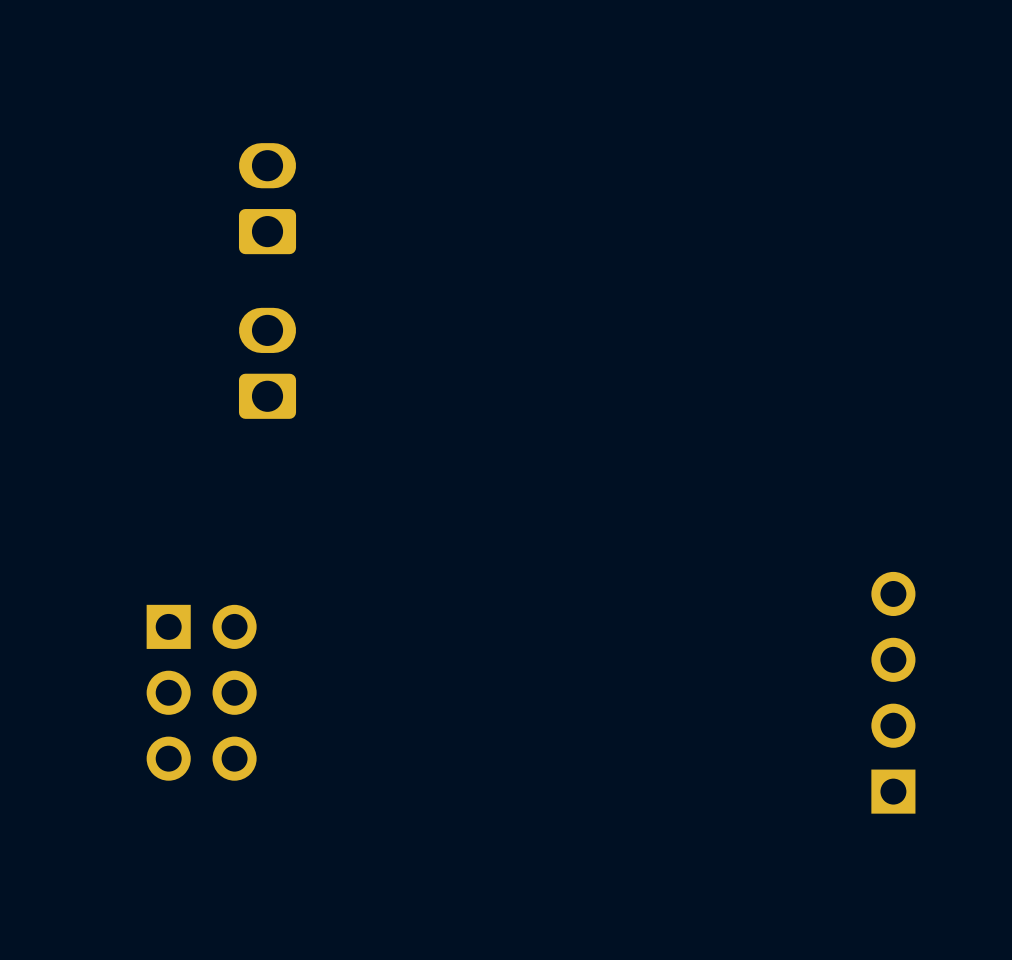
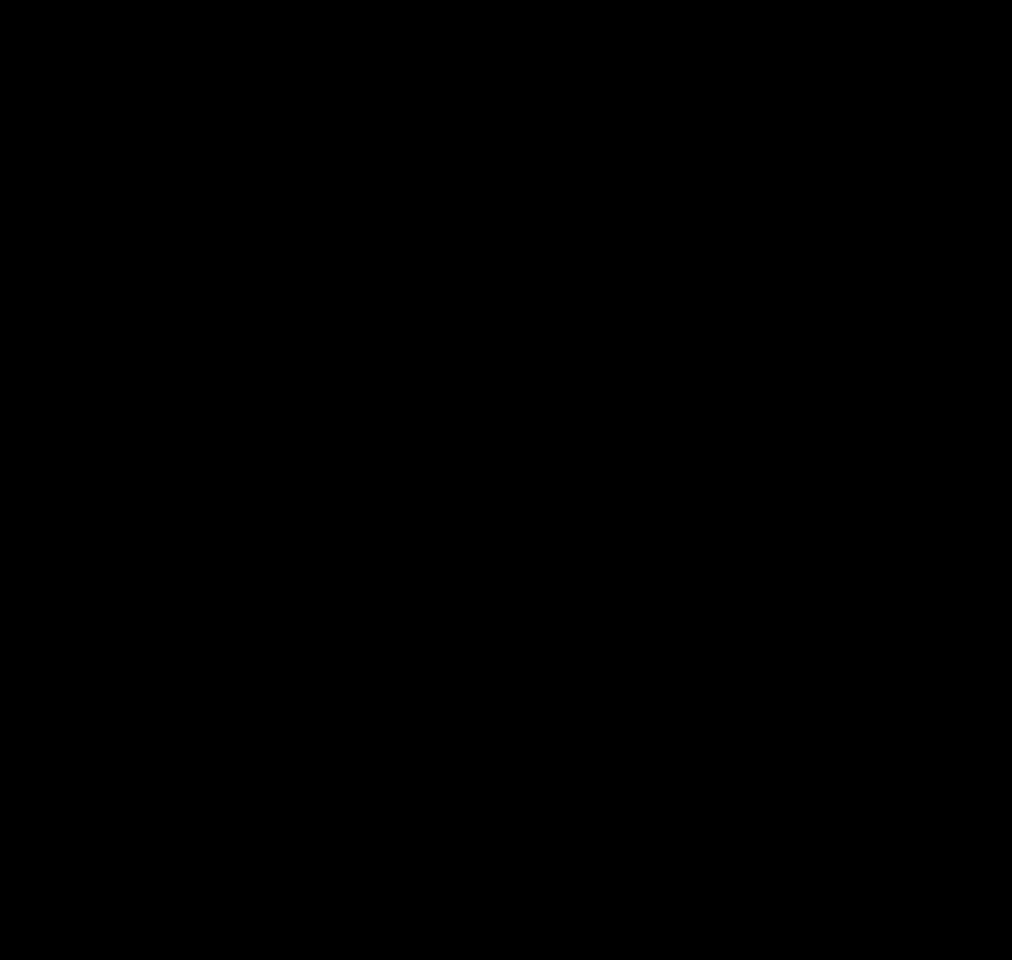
part: (267, 198) -> none
part: (267, 363) -> none
part: (201, 692) -> none
part: (893, 692) -> none

